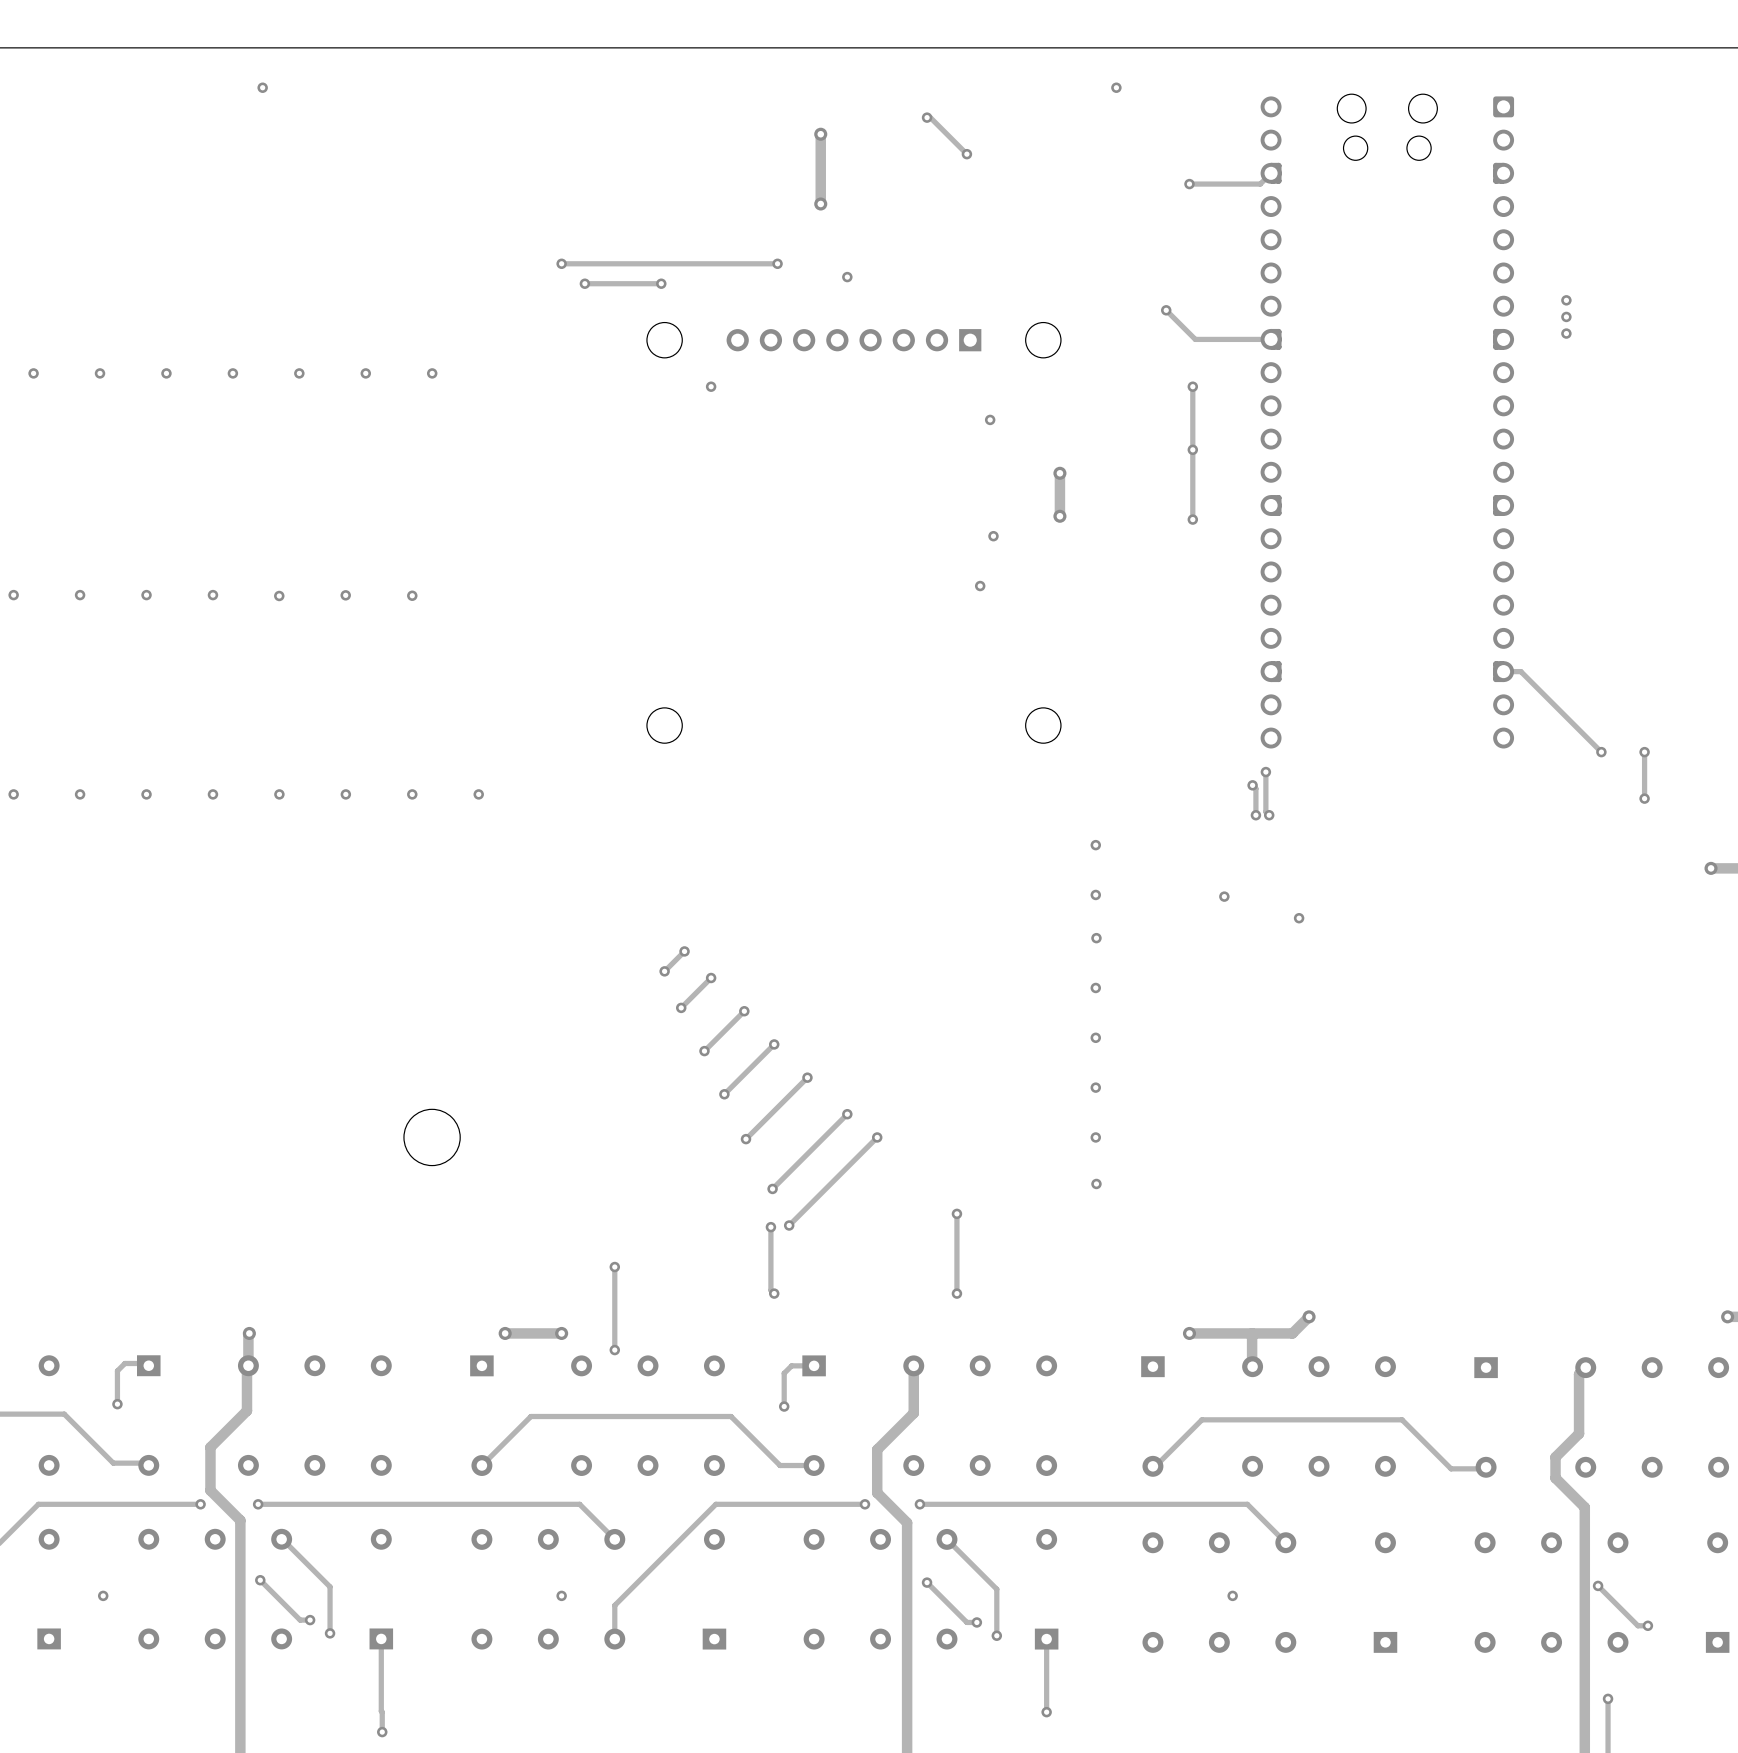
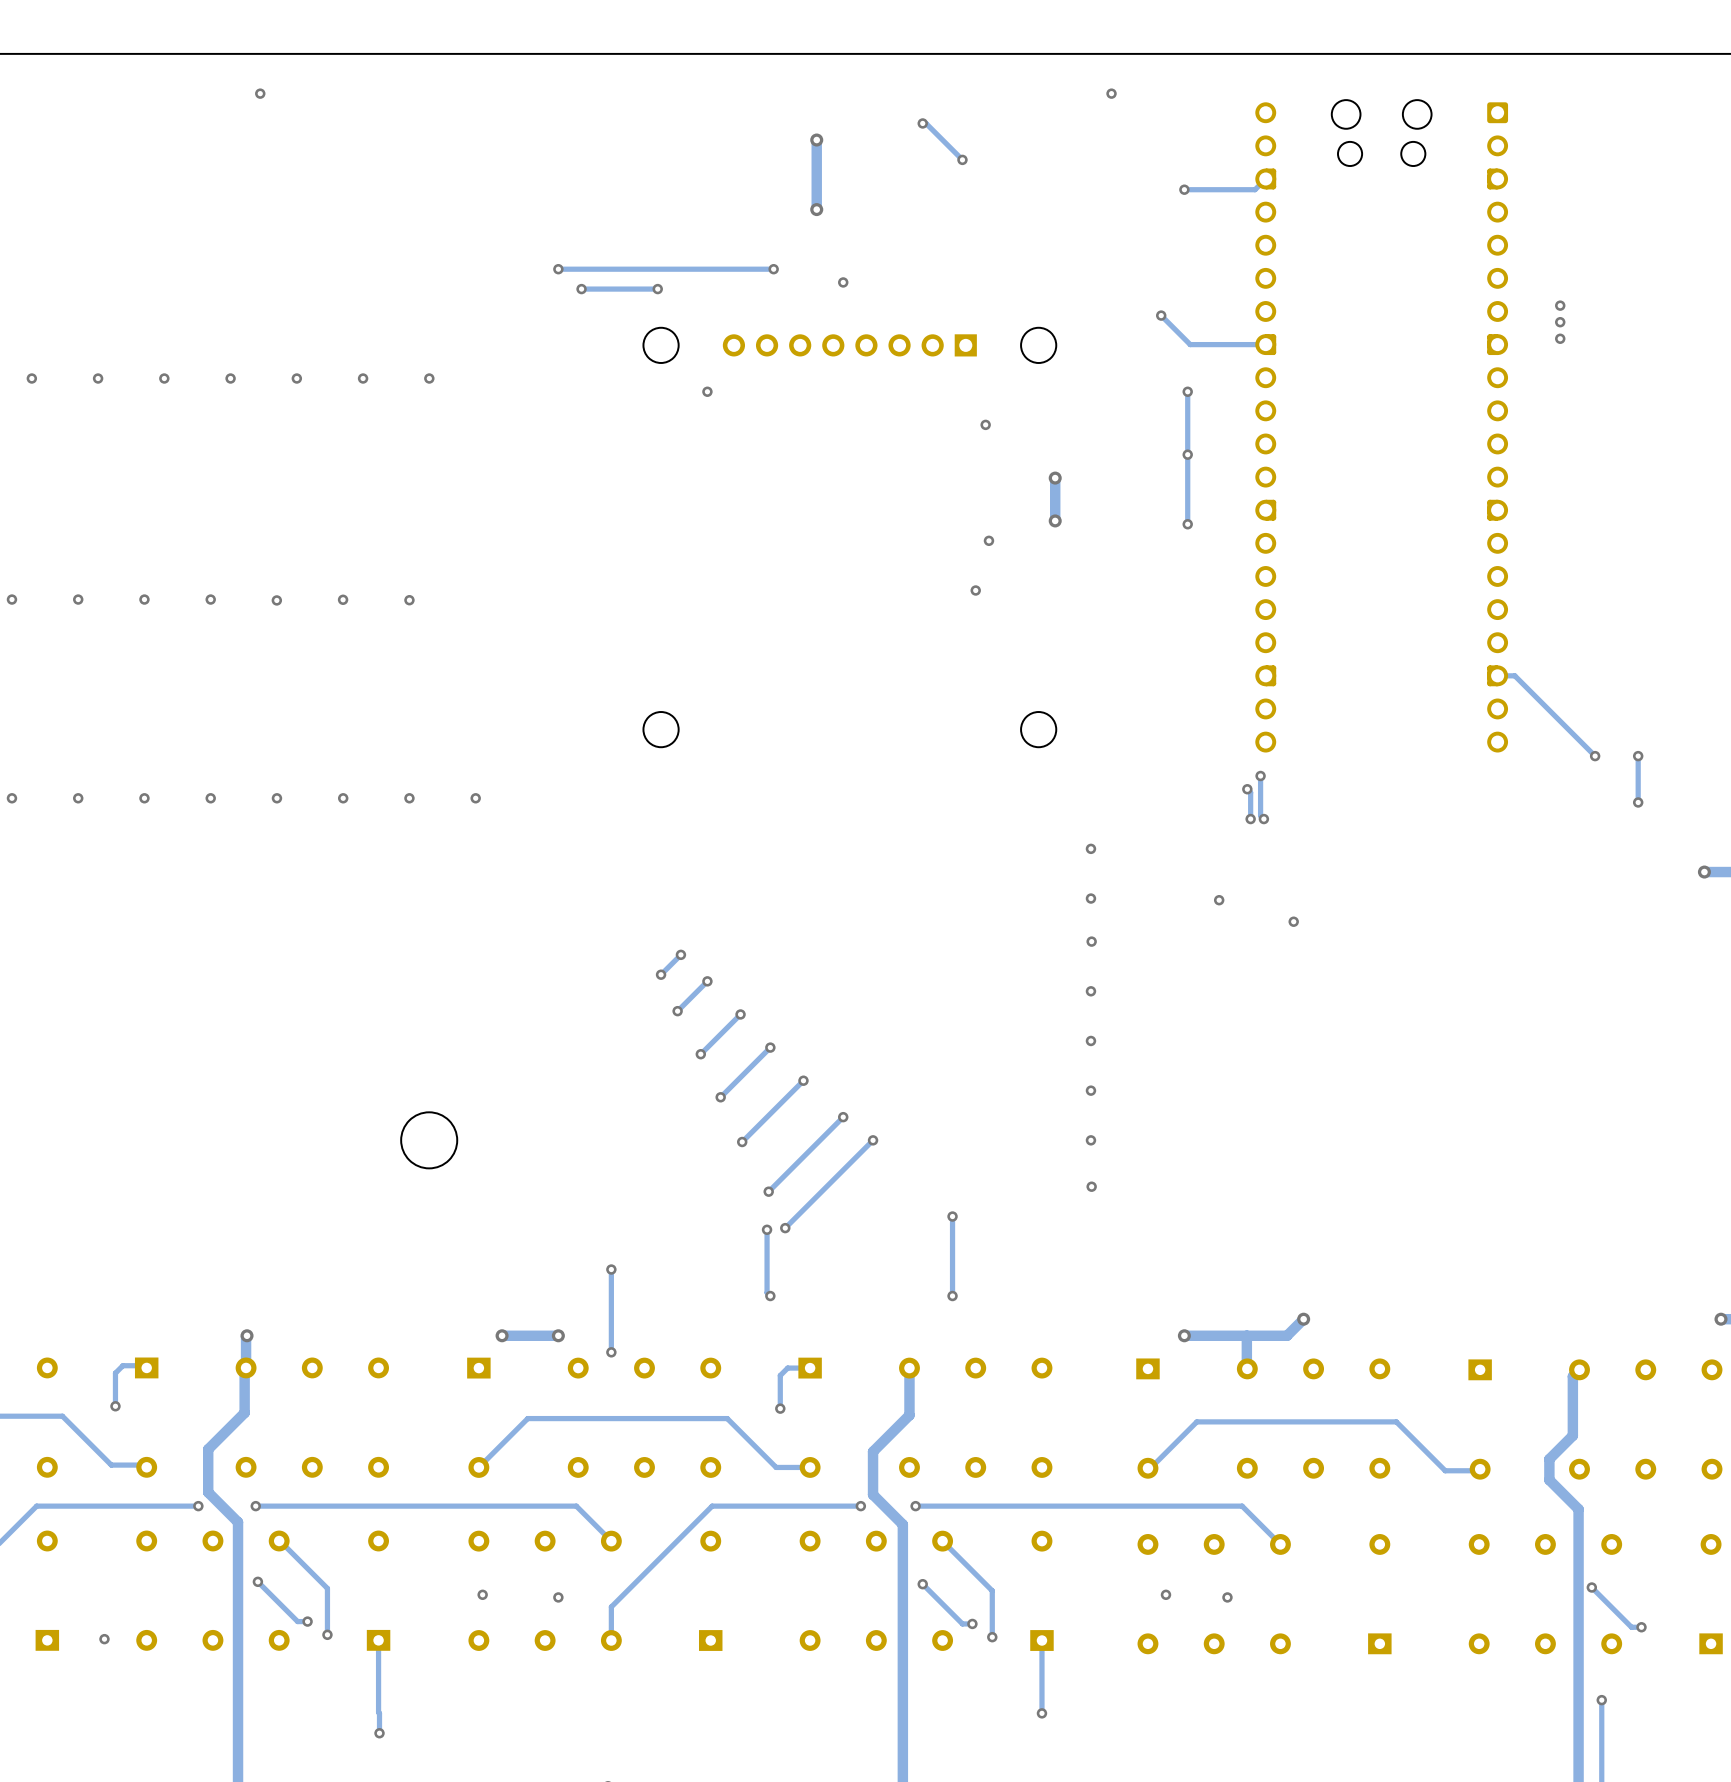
via: none -> (482, 1594)
via: none -> (1165, 1594)
via position: (103, 1595) -> (104, 1639)

